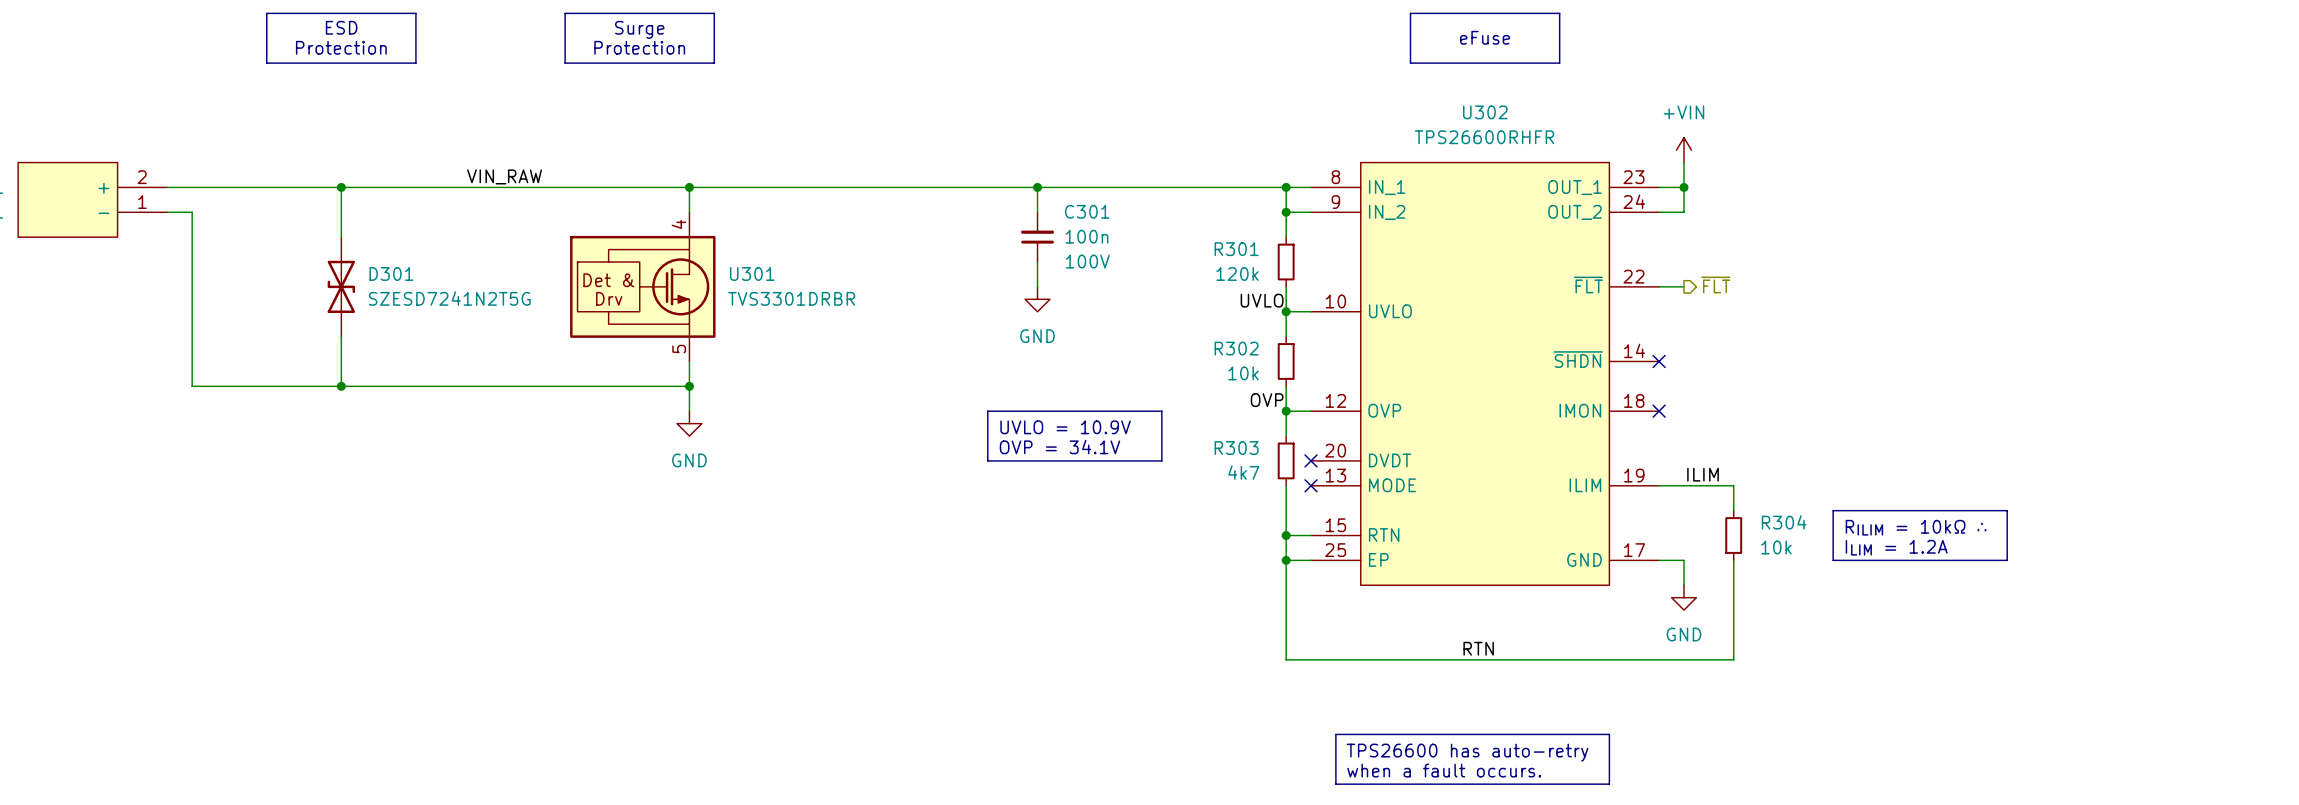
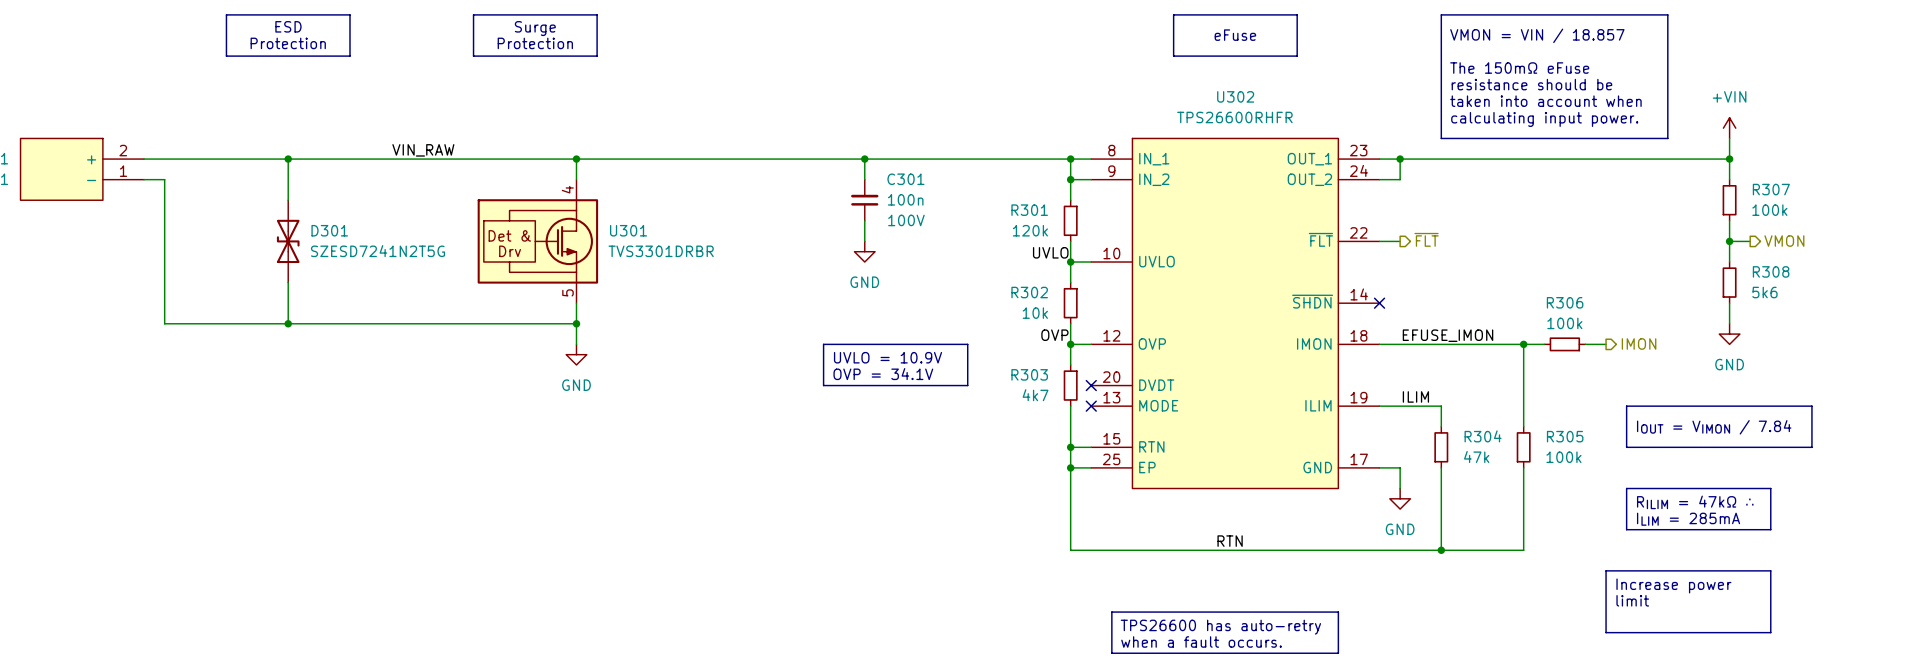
line: none -> (1441, 14) (1667, 14) (1667, 138) (1441, 138) (1441, 14)
text: none -> VMON = VIN / 18.857 (1537, 35)
text: none -> The 150mΩ eFuse (1519, 68)
text: none -> resistance should be (1531, 84)
text: none -> taken into account when (1545, 101)
text: none -> calculating input power. (1544, 119)
power symbol: +VIN (1683, 150) -> none
power symbol: none -> +VIN (1729, 128)
wire: (1683, 162) (1683, 187) -> (1729, 159) (1400, 159)
wire: none -> (1729, 138) (1729, 179)
junction: none -> (1729, 159)
R307: none -> 100k (1729, 200)
wire: none -> (1729, 220) (1729, 262)
wire: none -> (1729, 241) (1750, 241)
junction: none -> (1729, 241)
hierarchical label: none -> VMON (1784, 241)
R308: none -> 5k6 (1729, 282)
wire: none -> (1729, 303) (1729, 323)
power symbol: none -> GND (1729, 334)
label: none -> EFUSE_IMON (1448, 335)
hierarchical label: none -> IMON (1639, 343)
wire: none -> (1379, 344) (1544, 344)
no-connect mark: (1659, 411) -> none
wire: none -> (1523, 344) (1523, 426)
junction: none -> (1523, 344)
R306: none -> 100k (1564, 344)
wire: none -> (1585, 344) (1606, 344)
line: none -> (1626, 406) (1811, 406) (1811, 447) (1626, 447) (1626, 406)
line: (1833, 510) (2007, 510) (2007, 560) (1833, 560) (1833, 510) -> (1626, 488) (1770, 488) (1770, 529) (1626, 529) (1626, 488)
text: none -> IOUT = VIMON / 7.84 (1714, 427)
text: RILIM = 10kΩ ∴ (1916, 527) -> none
R305: none -> 100k (1523, 447)
R304 value: 10k (1776, 547) -> 47k (1476, 456)
text: ILIM = 1.2A (1896, 547) -> none
wire: none -> (1523, 467) (1523, 550) (1441, 550)
text: none -> RILIM = 47kΩ ∴ (1695, 502)
text: none -> ILIM = 285mA (1688, 519)
junction: none -> (1441, 550)
line: none -> (1606, 570) (1770, 570) (1770, 632) (1606, 632) (1606, 570)
text: none -> Increase power (1673, 585)
text: none -> limit (1632, 600)

